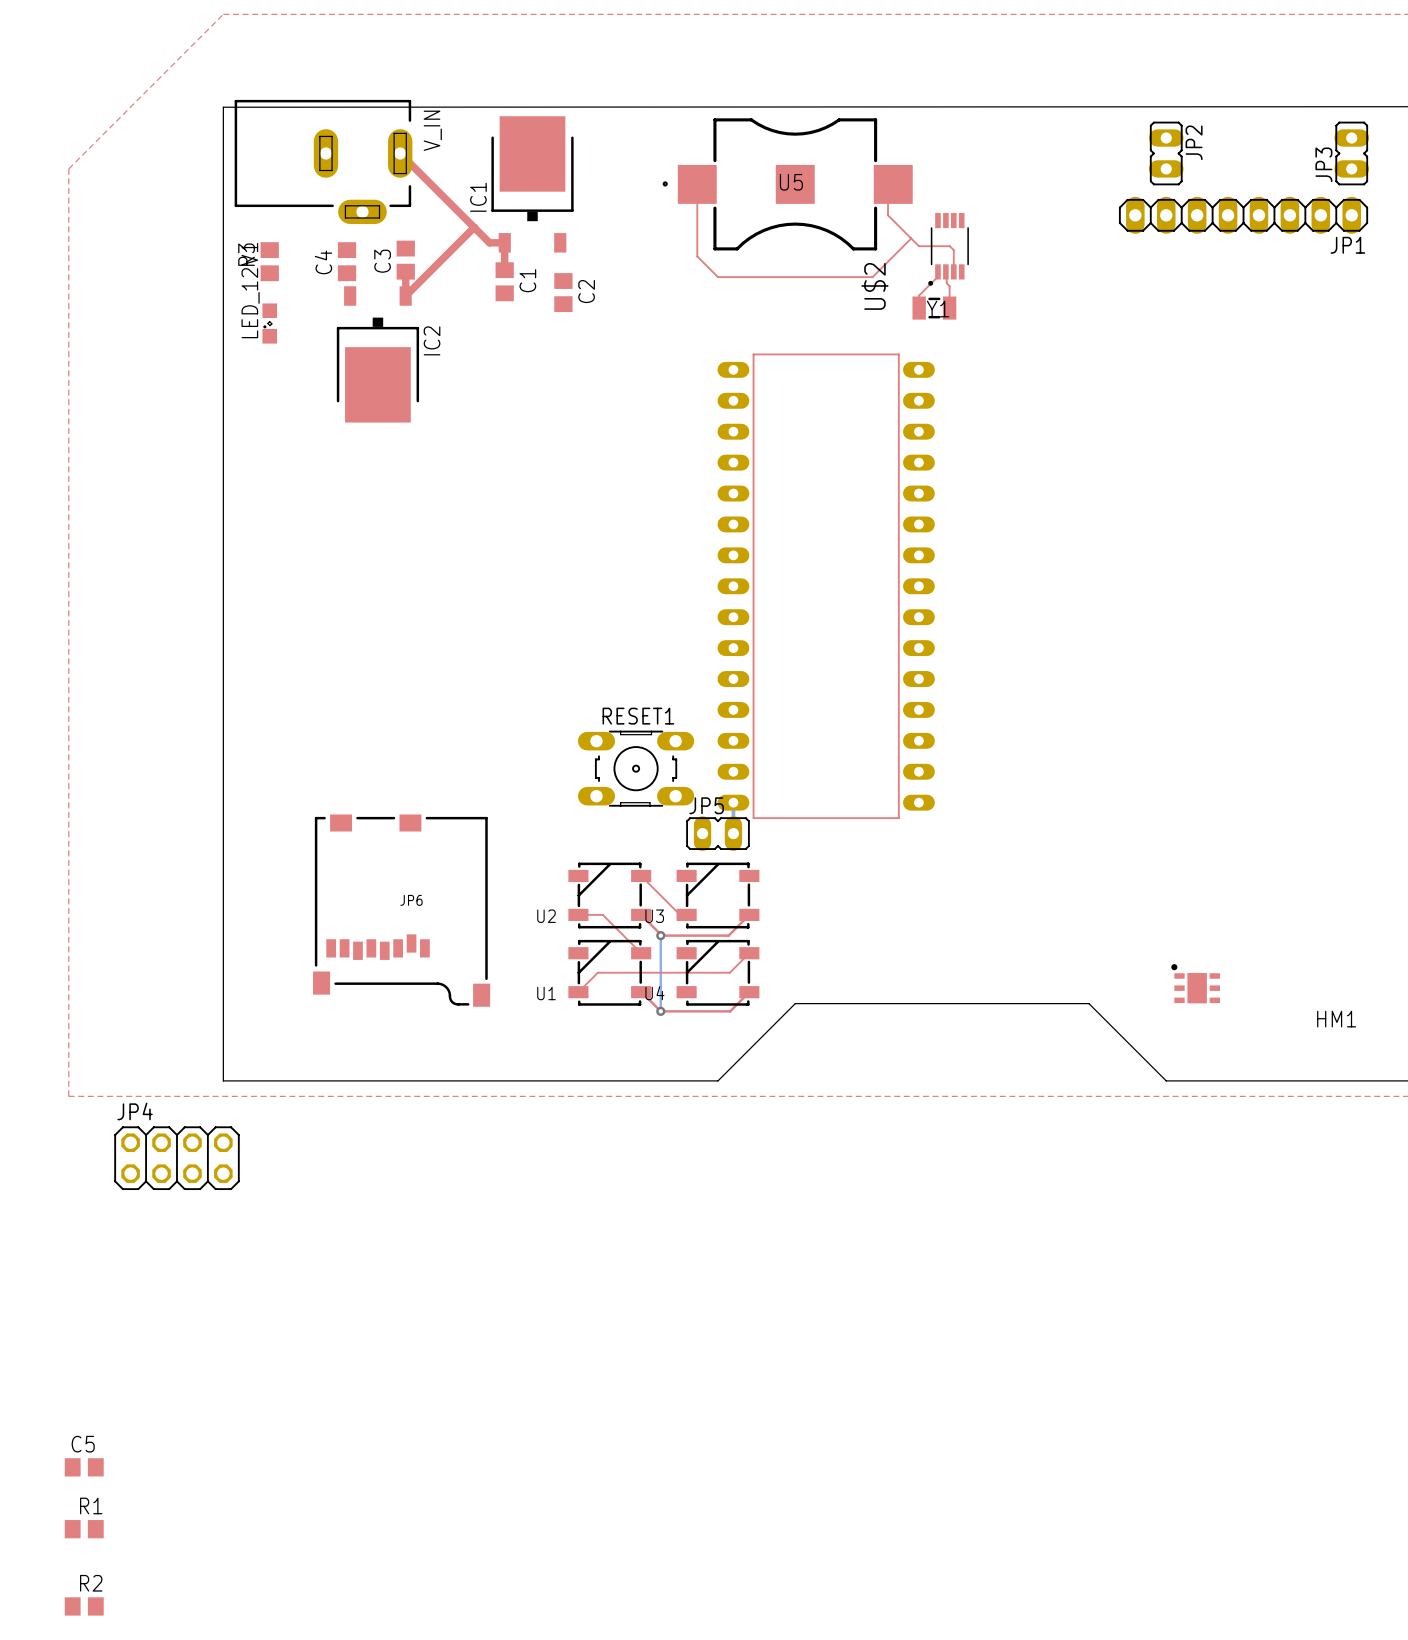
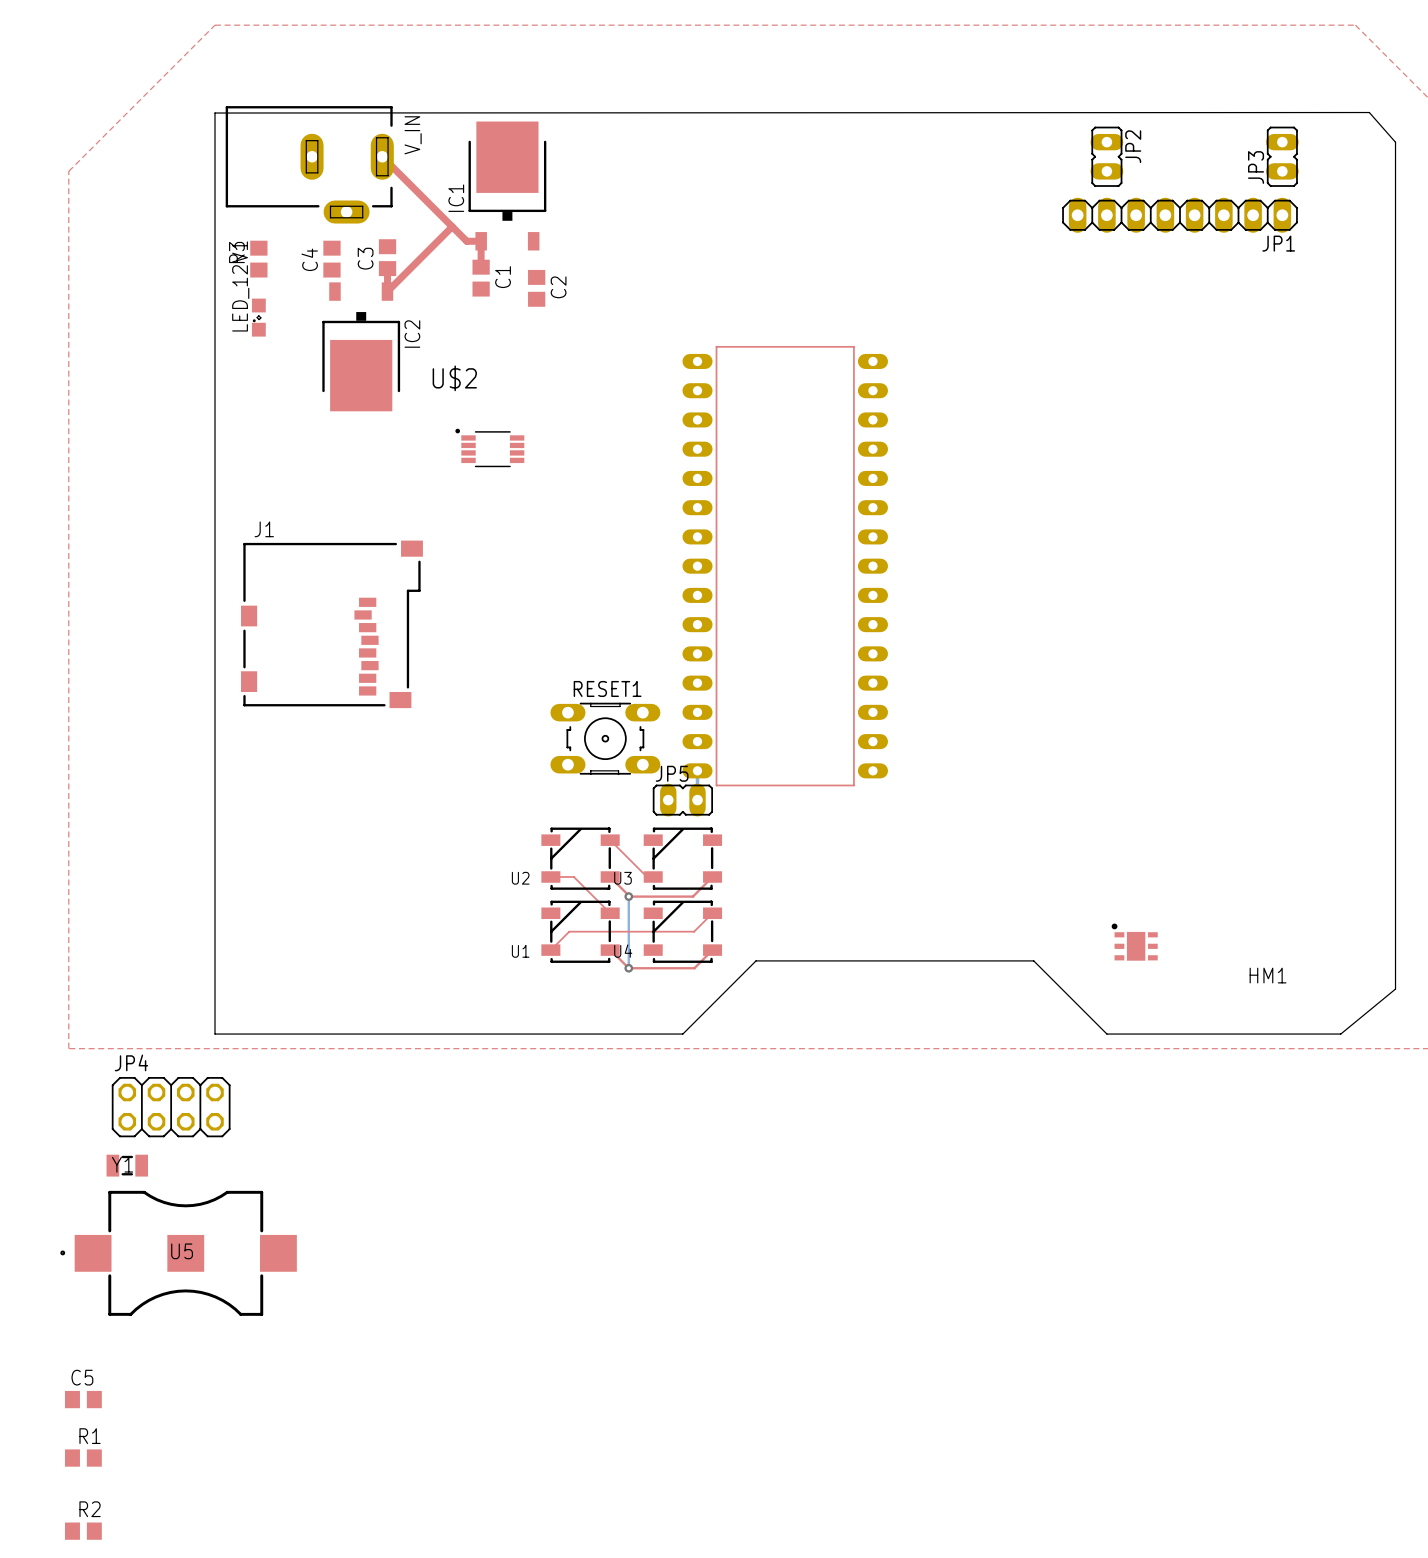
top track: (697, 184) (697, 256) (717, 277) (872, 277) (911, 238) -> none
U5 position: (787, 184) -> (178, 1253)
top track: (893, 184) (888, 189) (888, 215) (918, 246) (949, 246) (953, 250) (953, 271) -> none
U$2 rotation: 0° (948, 249) -> 90° clockwise (489, 447)
U$2 position: (948, 249) -> (489, 447)
top track: (937, 271) (937, 276) (919, 295) (919, 308) -> none
top track: (945, 271) (946, 283) (949, 286) (949, 308) -> none
Y1 position: (934, 308) -> (127, 1165)
Y1 name position: Y1 (938, 309) -> Y1 (122, 1164)
J1: none -> (331, 624)
JP6: (401, 910) -> none

